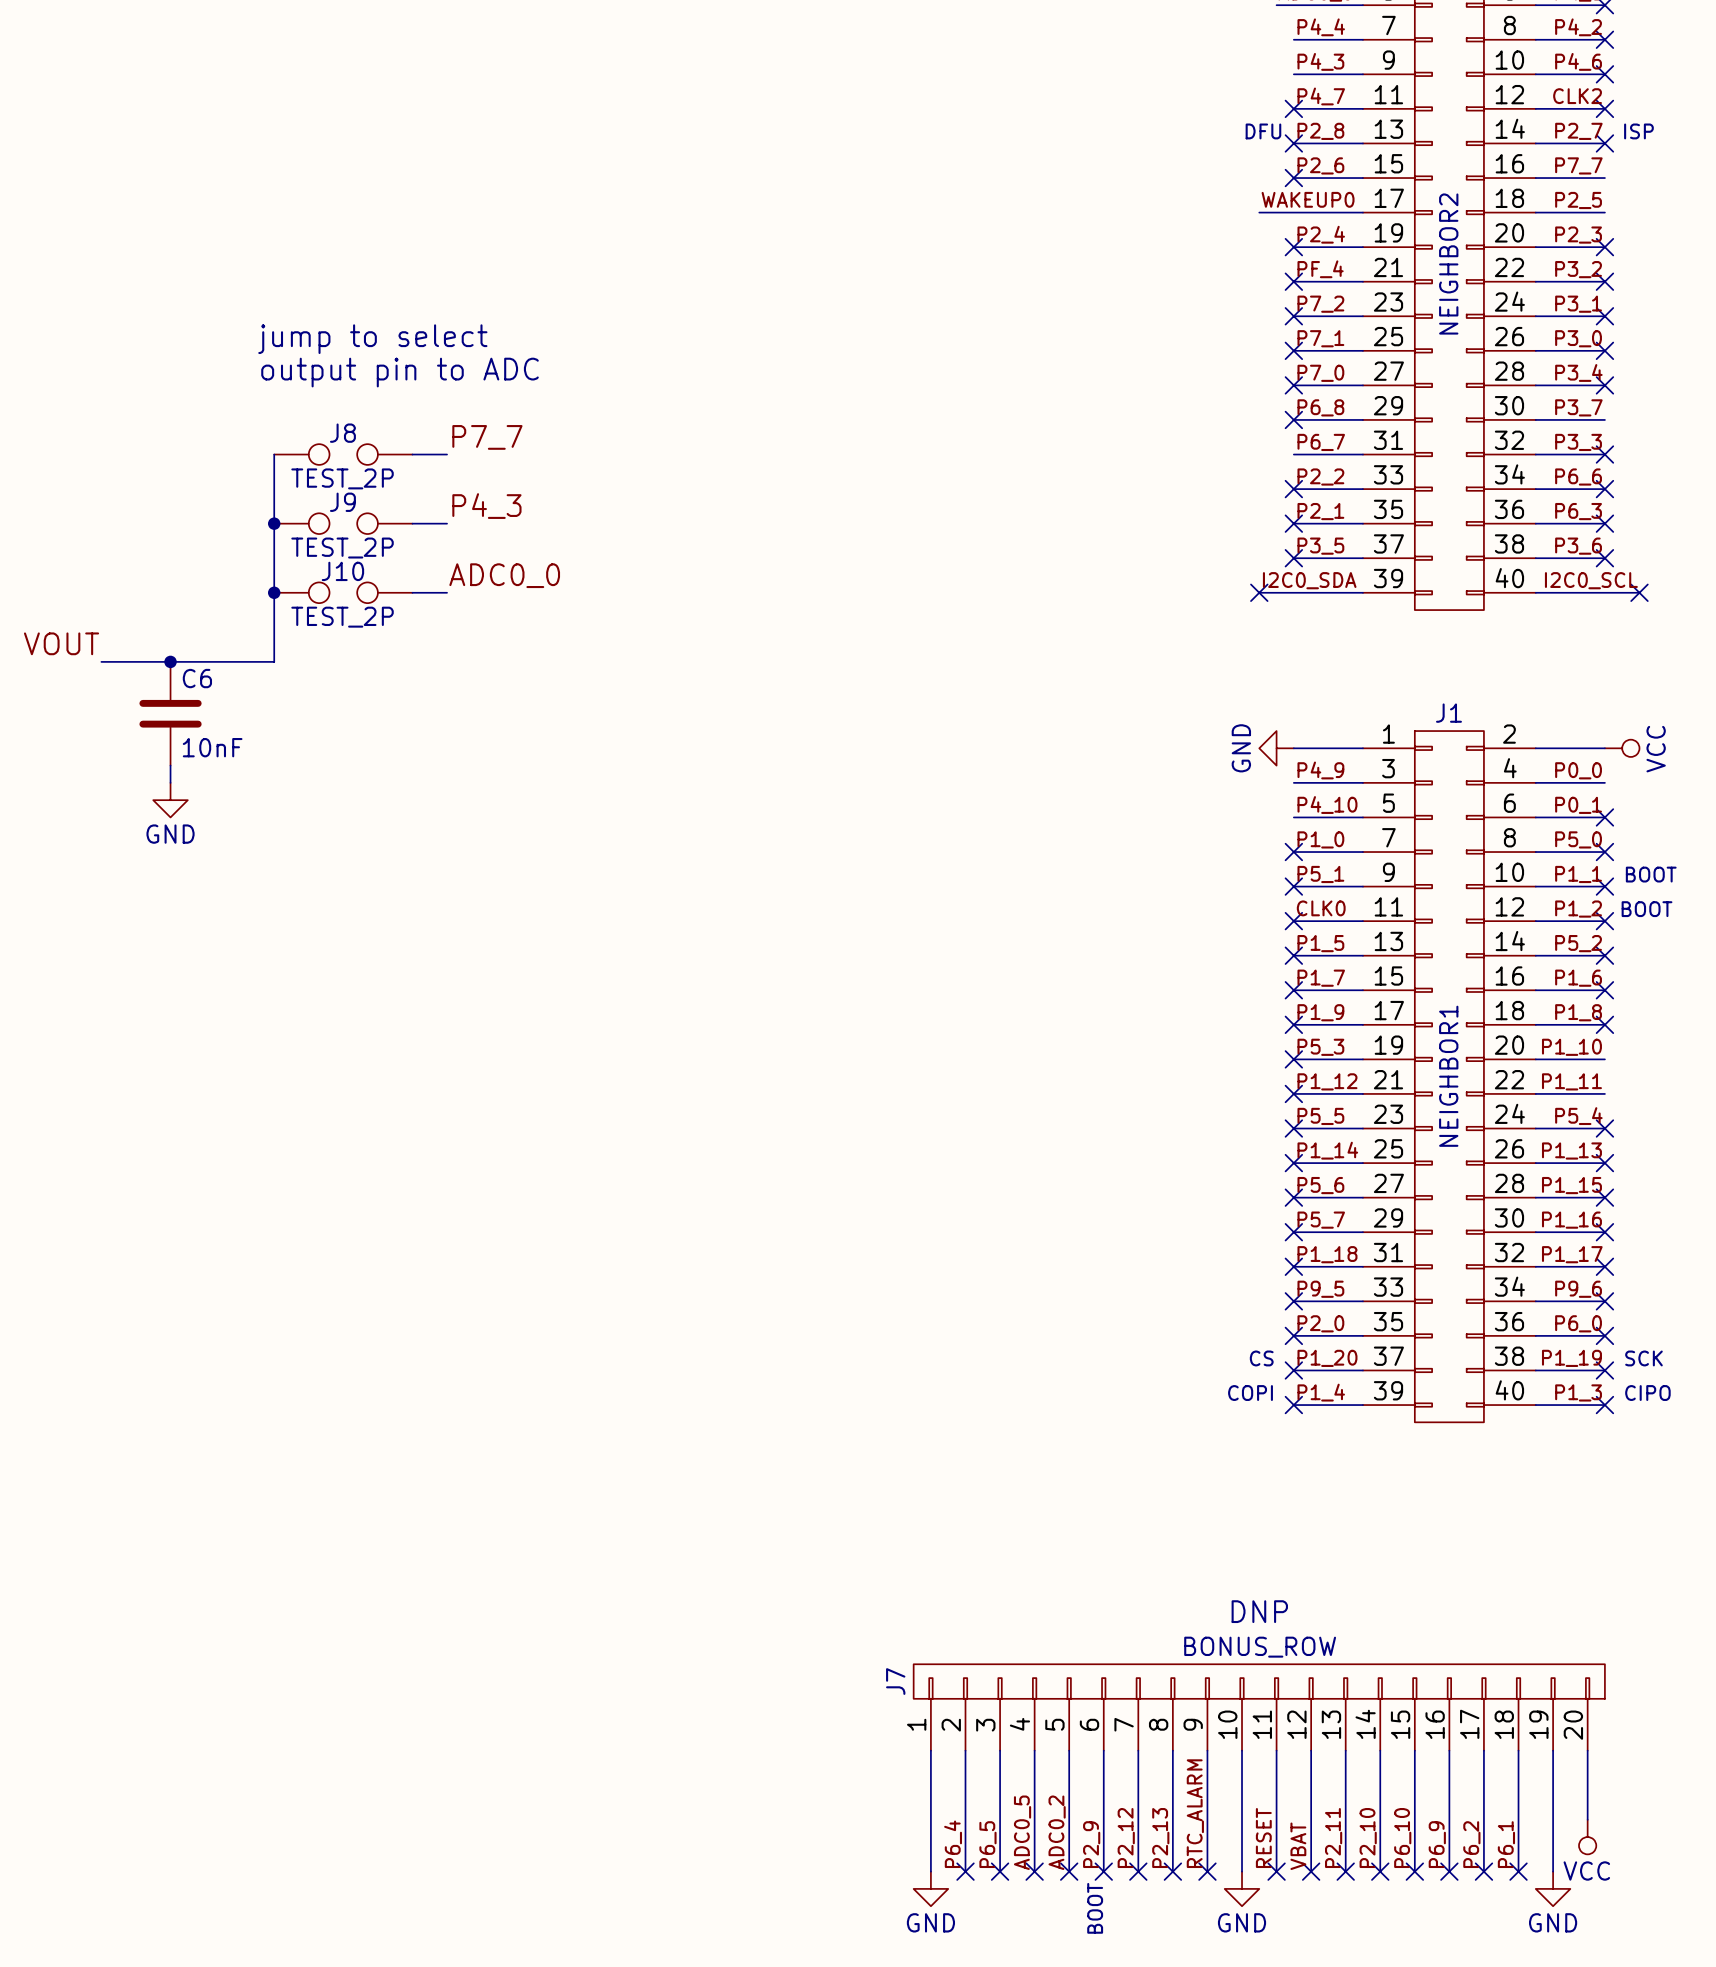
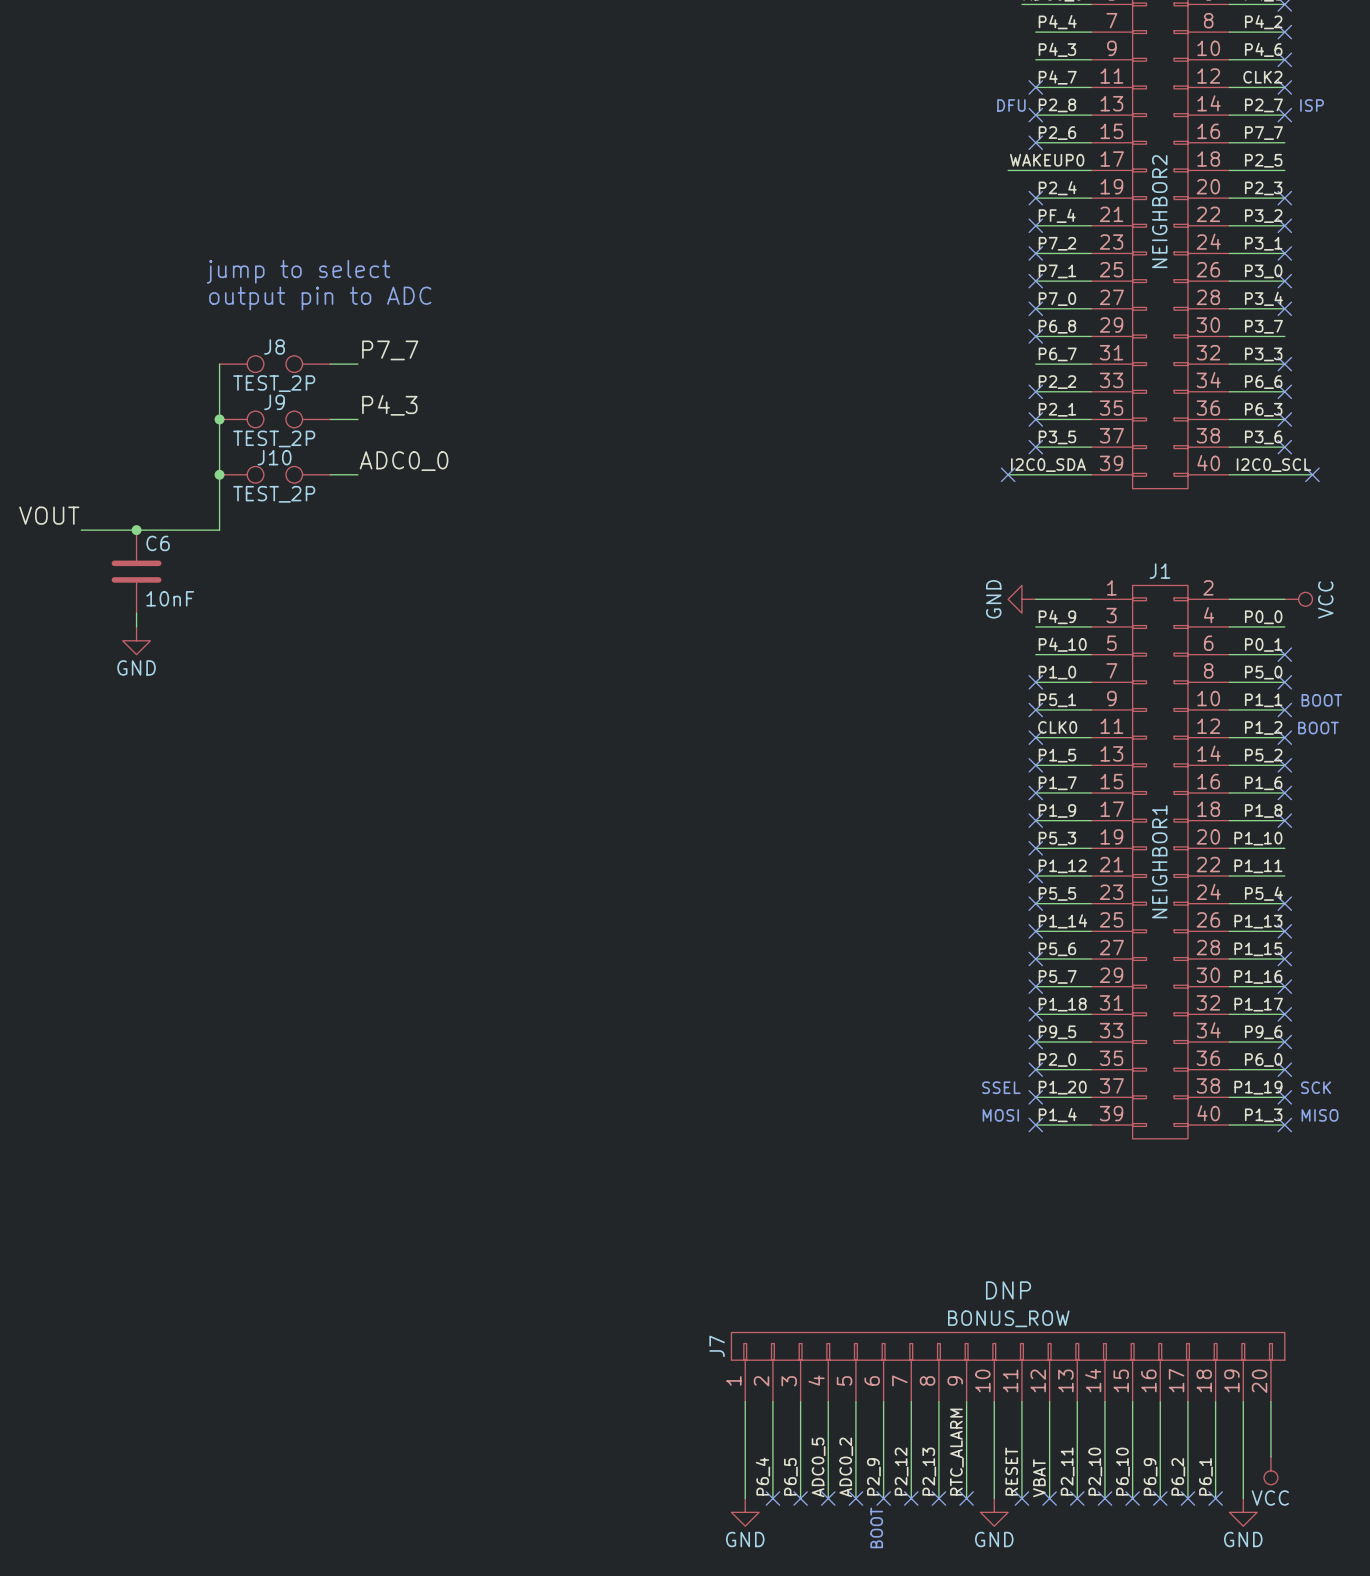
text: CS (1261, 1358) -> SSEL (1001, 1087)
text: COPI (1250, 1393) -> MOSI (1000, 1115)
text: CIPO (1647, 1393) -> MISO (1320, 1115)

